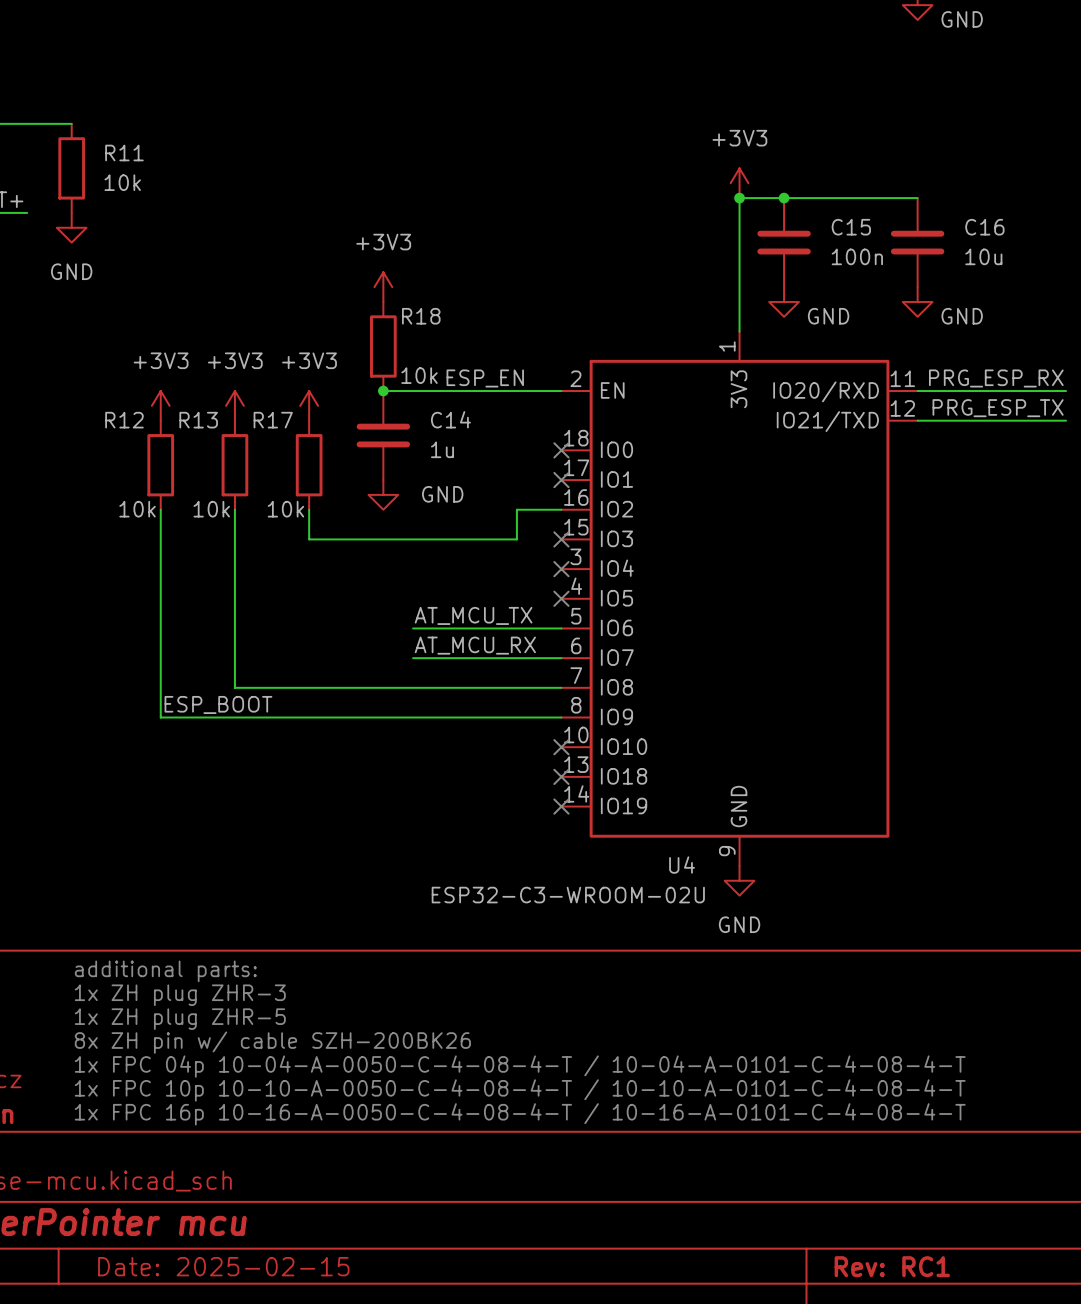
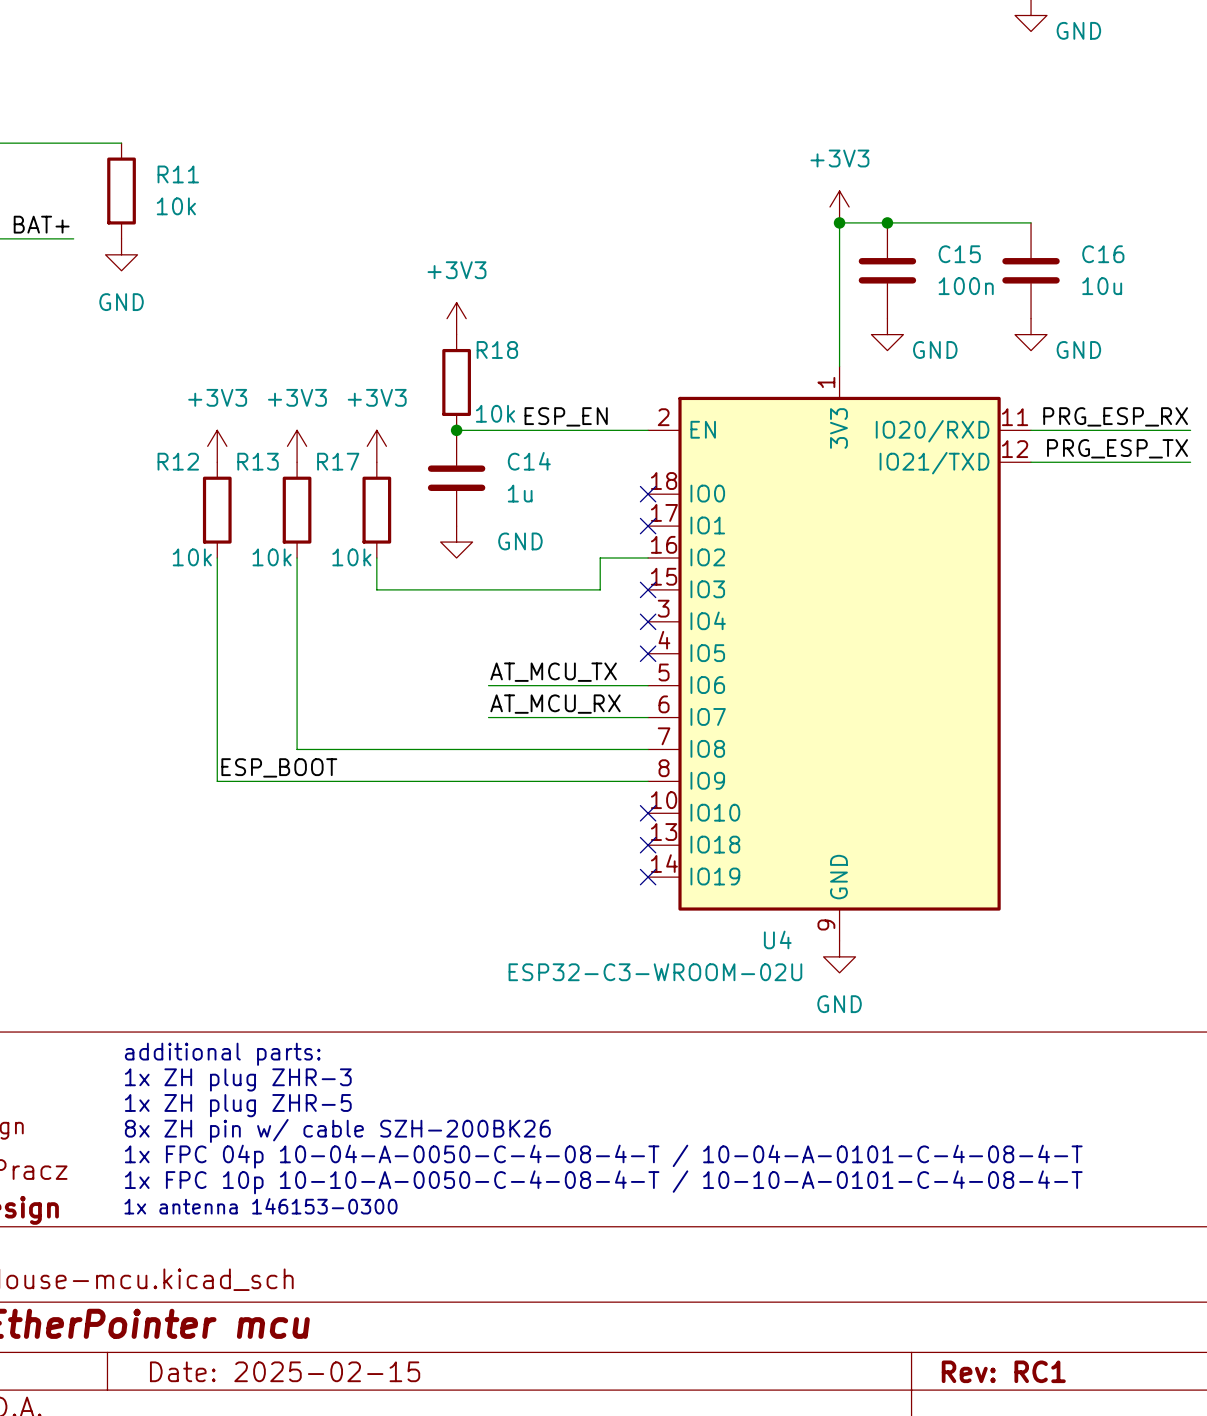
text: 1x FPC 16p 10-16-A-0050-C-4-08-4-T / 10-16-A-0101-C-4-08-4-T (520, 1114) -> 1x antenna 146153-0300 (261, 1206)

